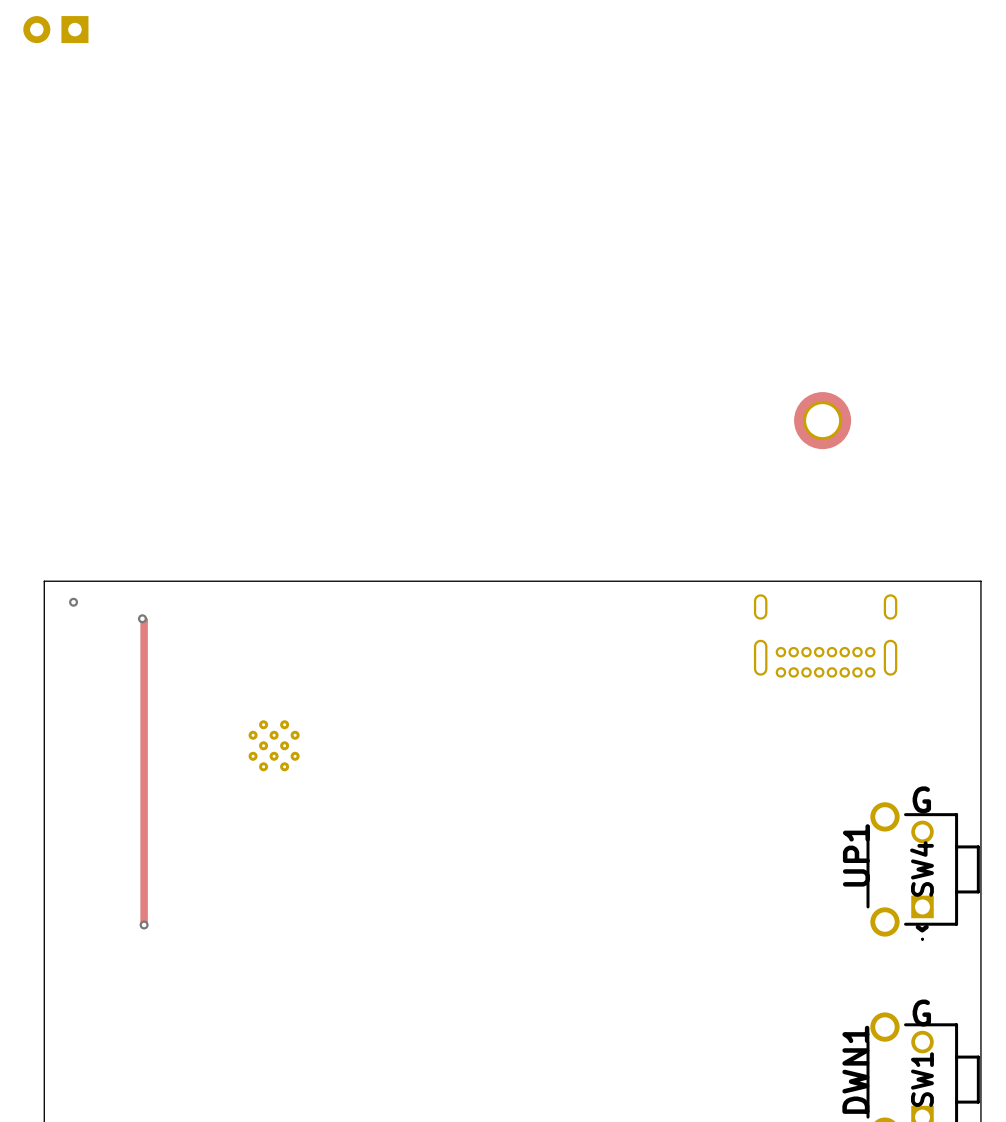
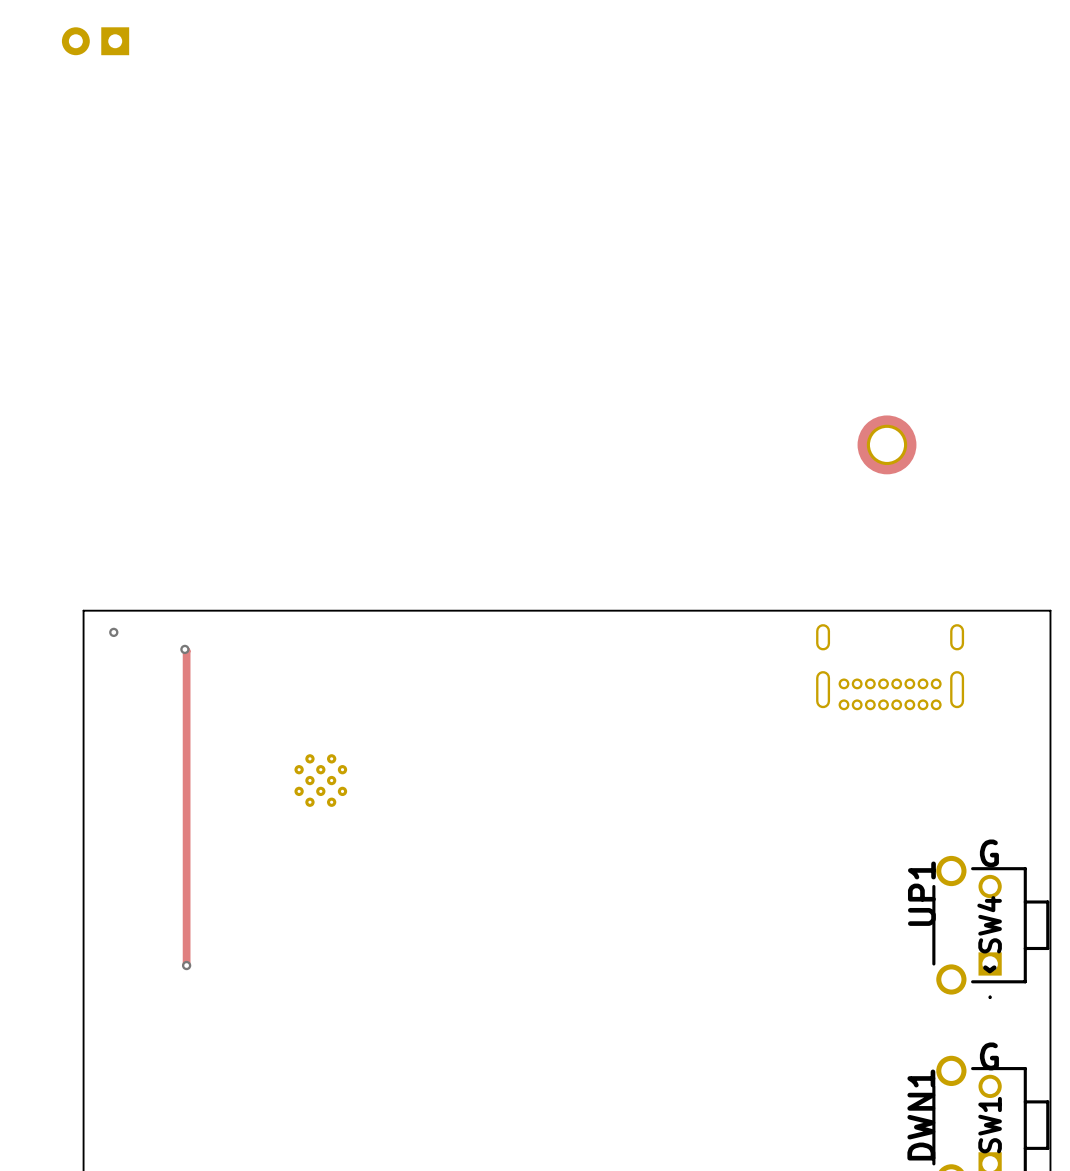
text position: G (921, 799) -> G (989, 853)
SW4 position: (923, 871) -> (990, 927)

